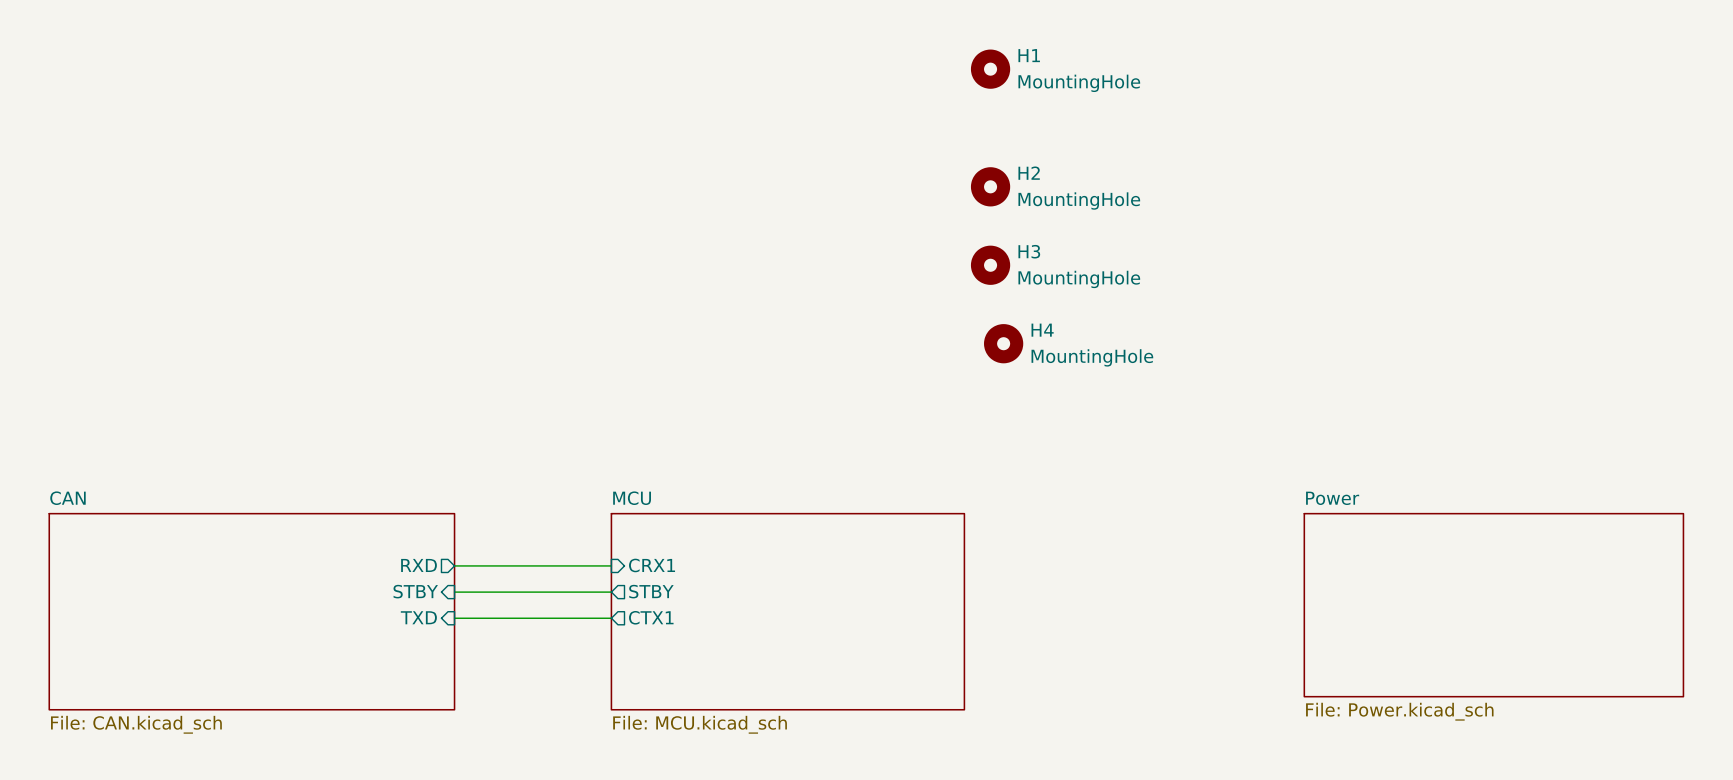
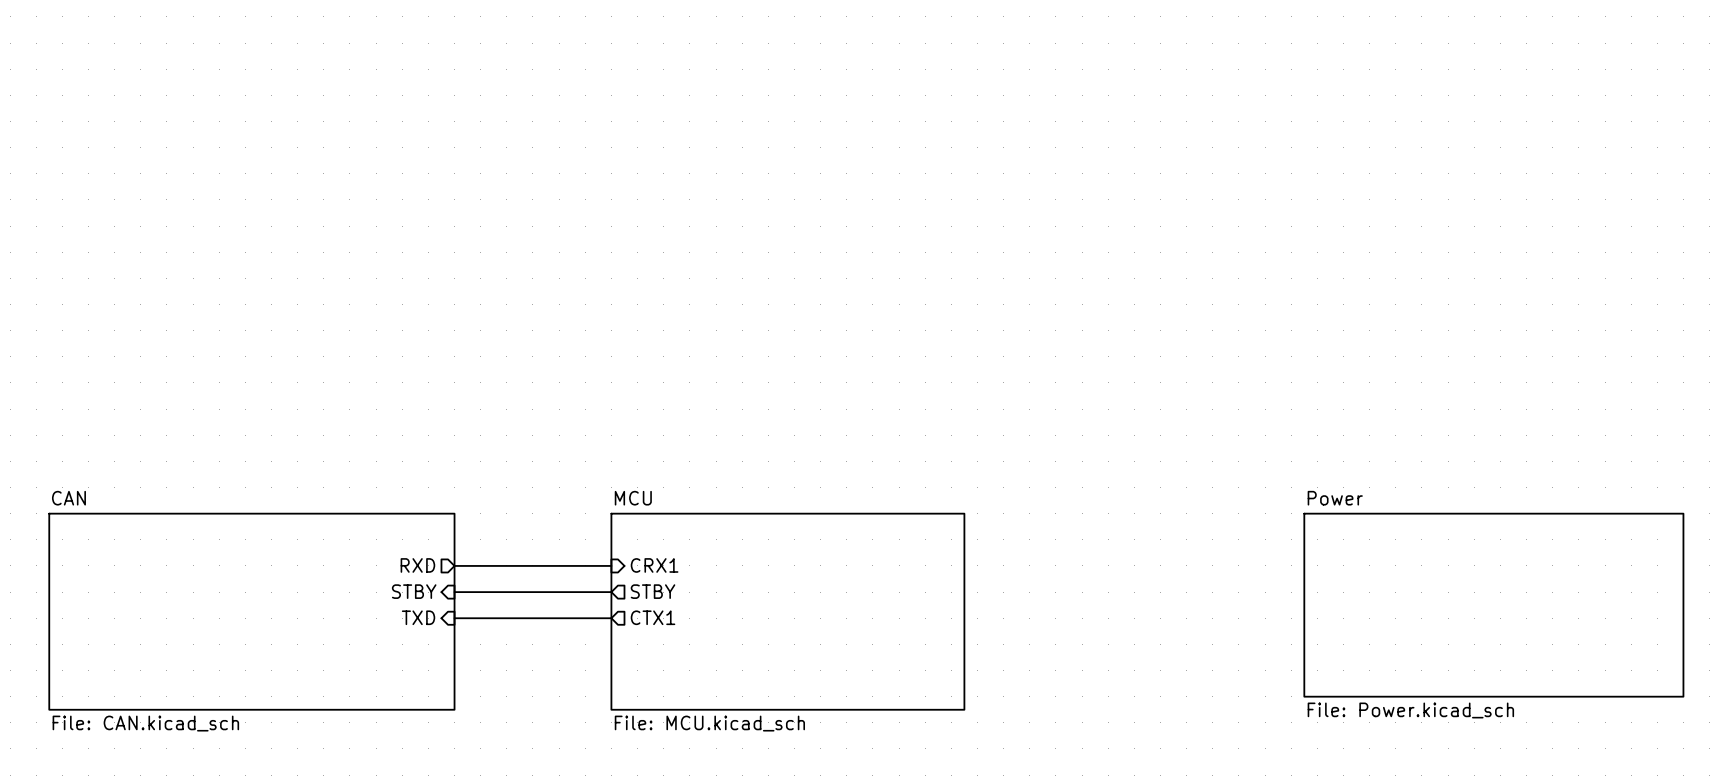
H1: MountingHole (990, 69) -> none
H2: MountingHole (990, 186) -> none
H3: MountingHole (990, 265) -> none
H4: MountingHole (1003, 343) -> none

